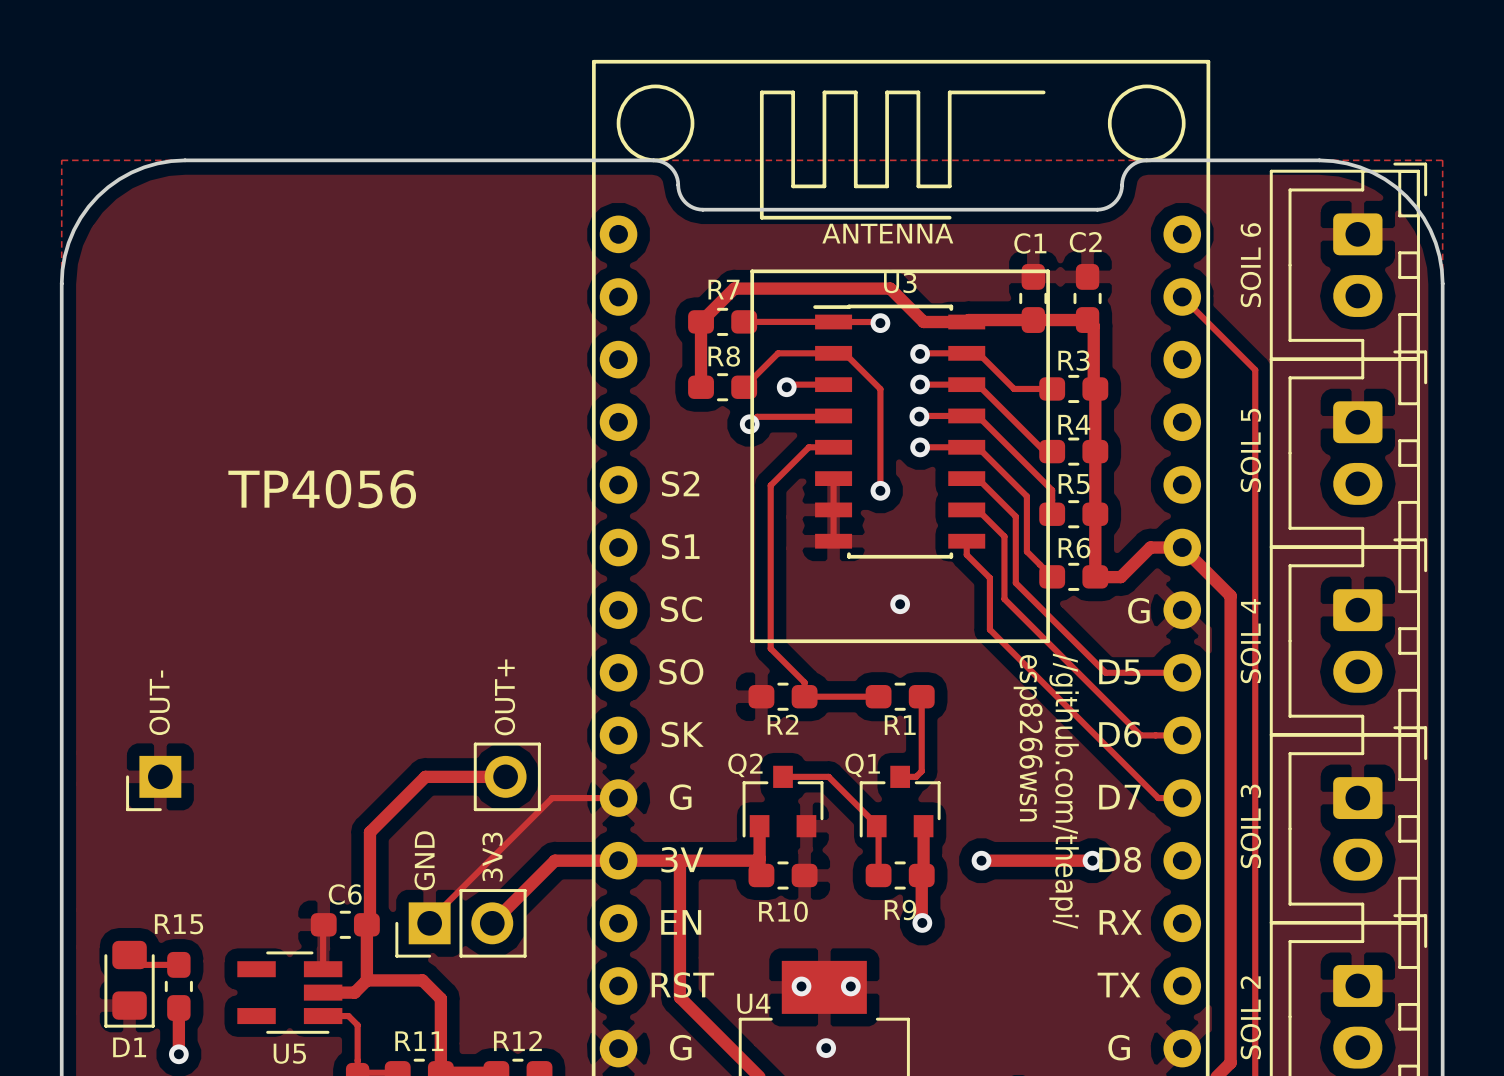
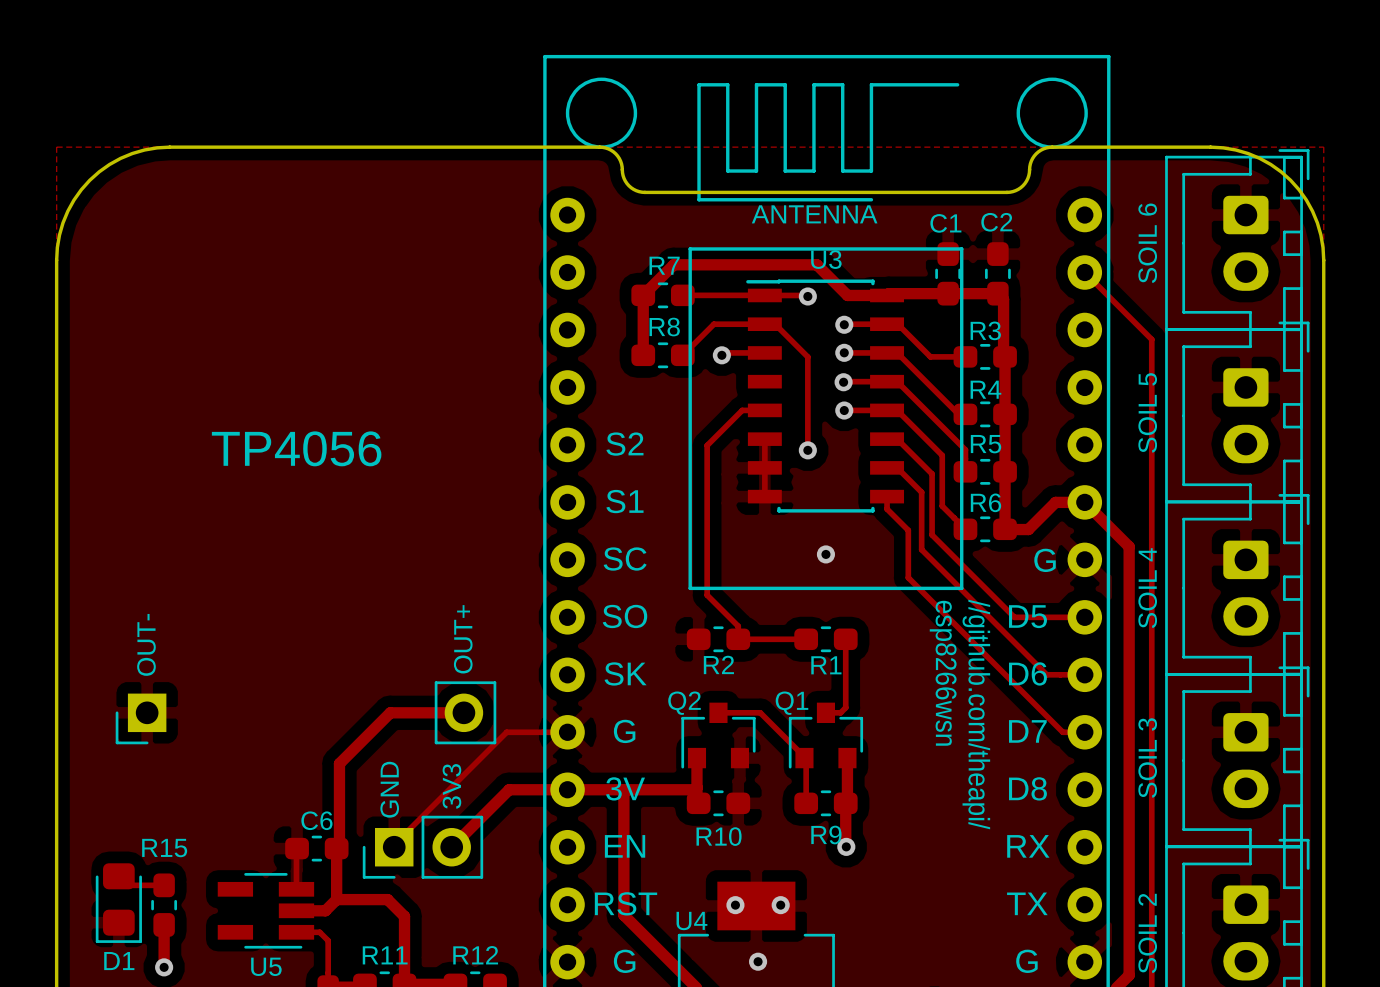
track: (833, 415) (757, 416) (749, 424) -> none
via: (749, 424) -> none
track: (981, 860) (1092, 860) -> none
via: (981, 860) -> none
via: (1092, 860) -> none

